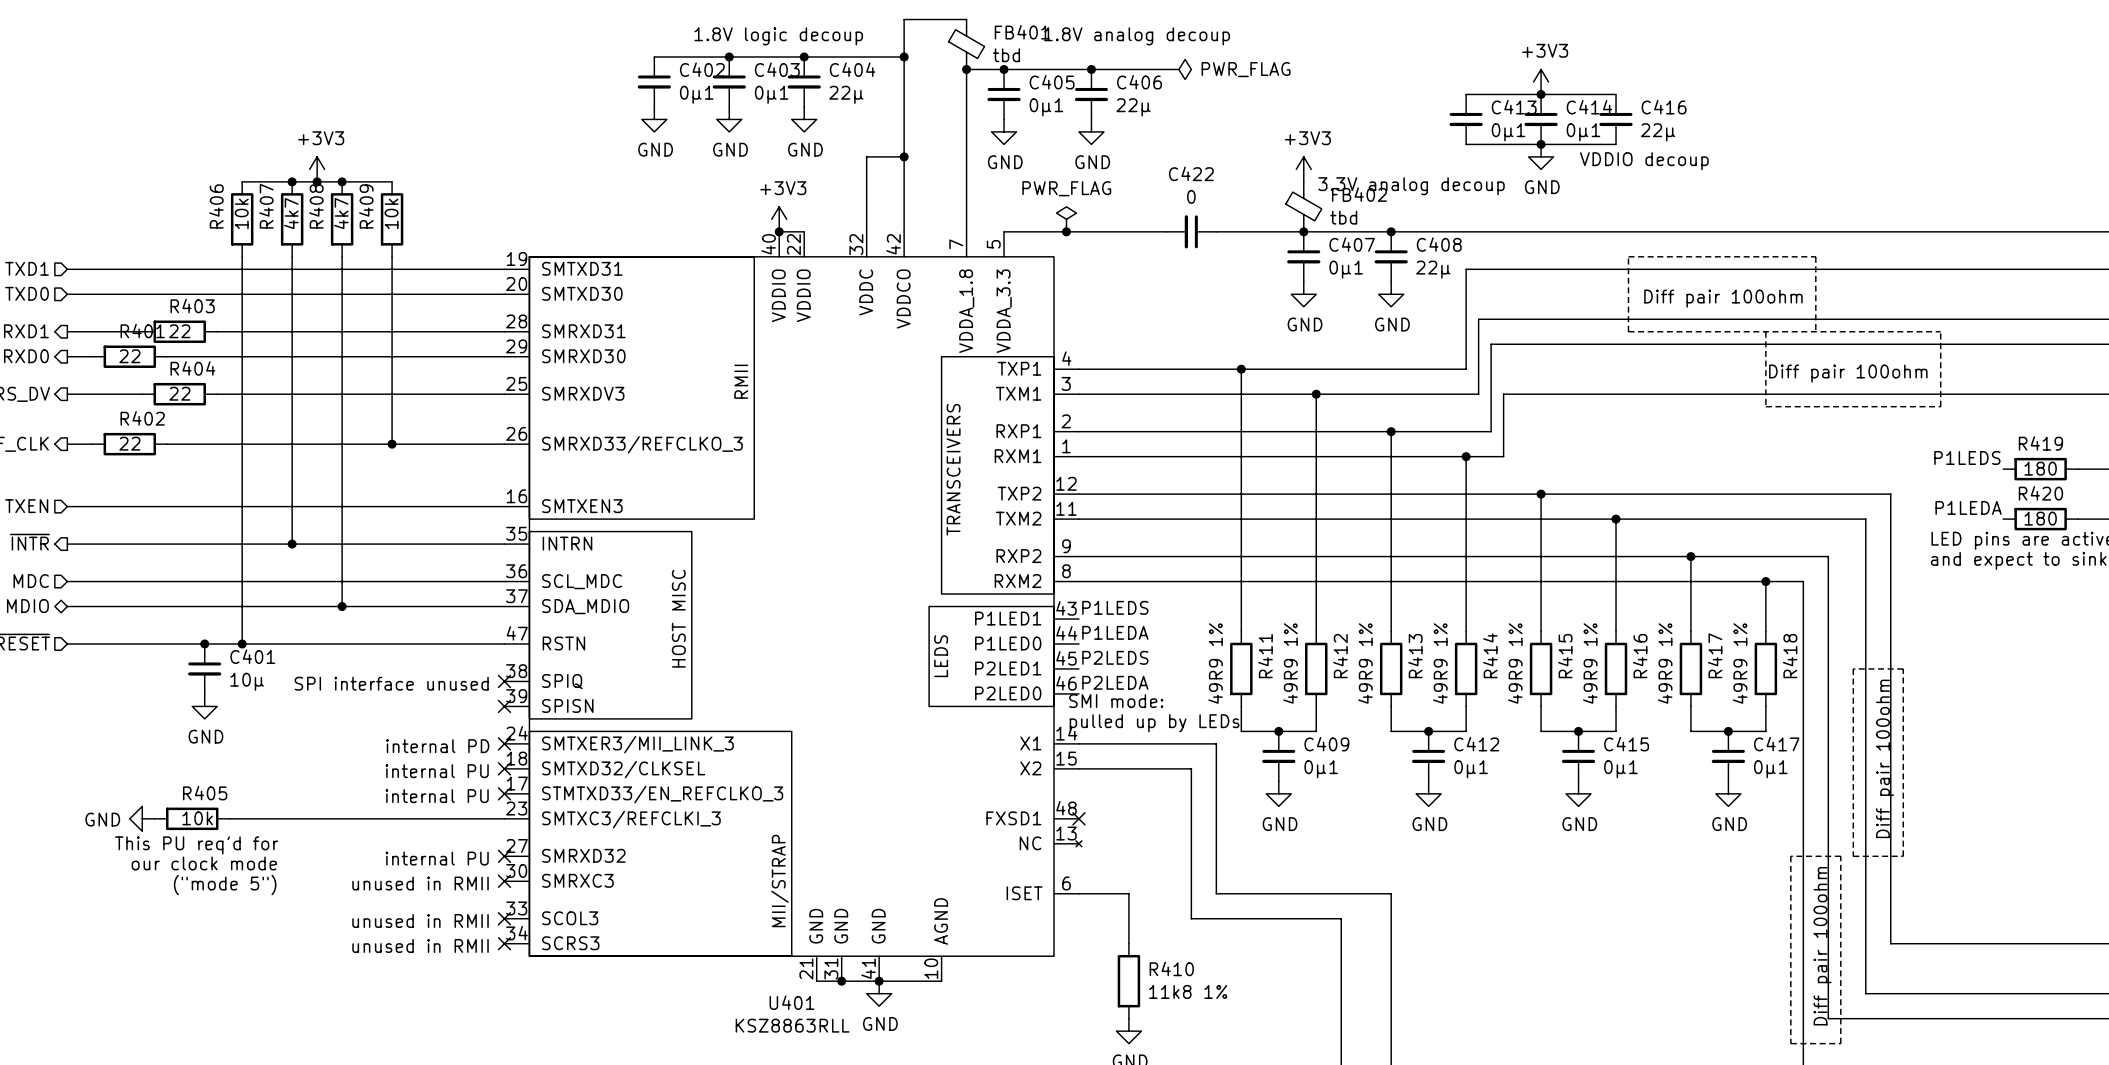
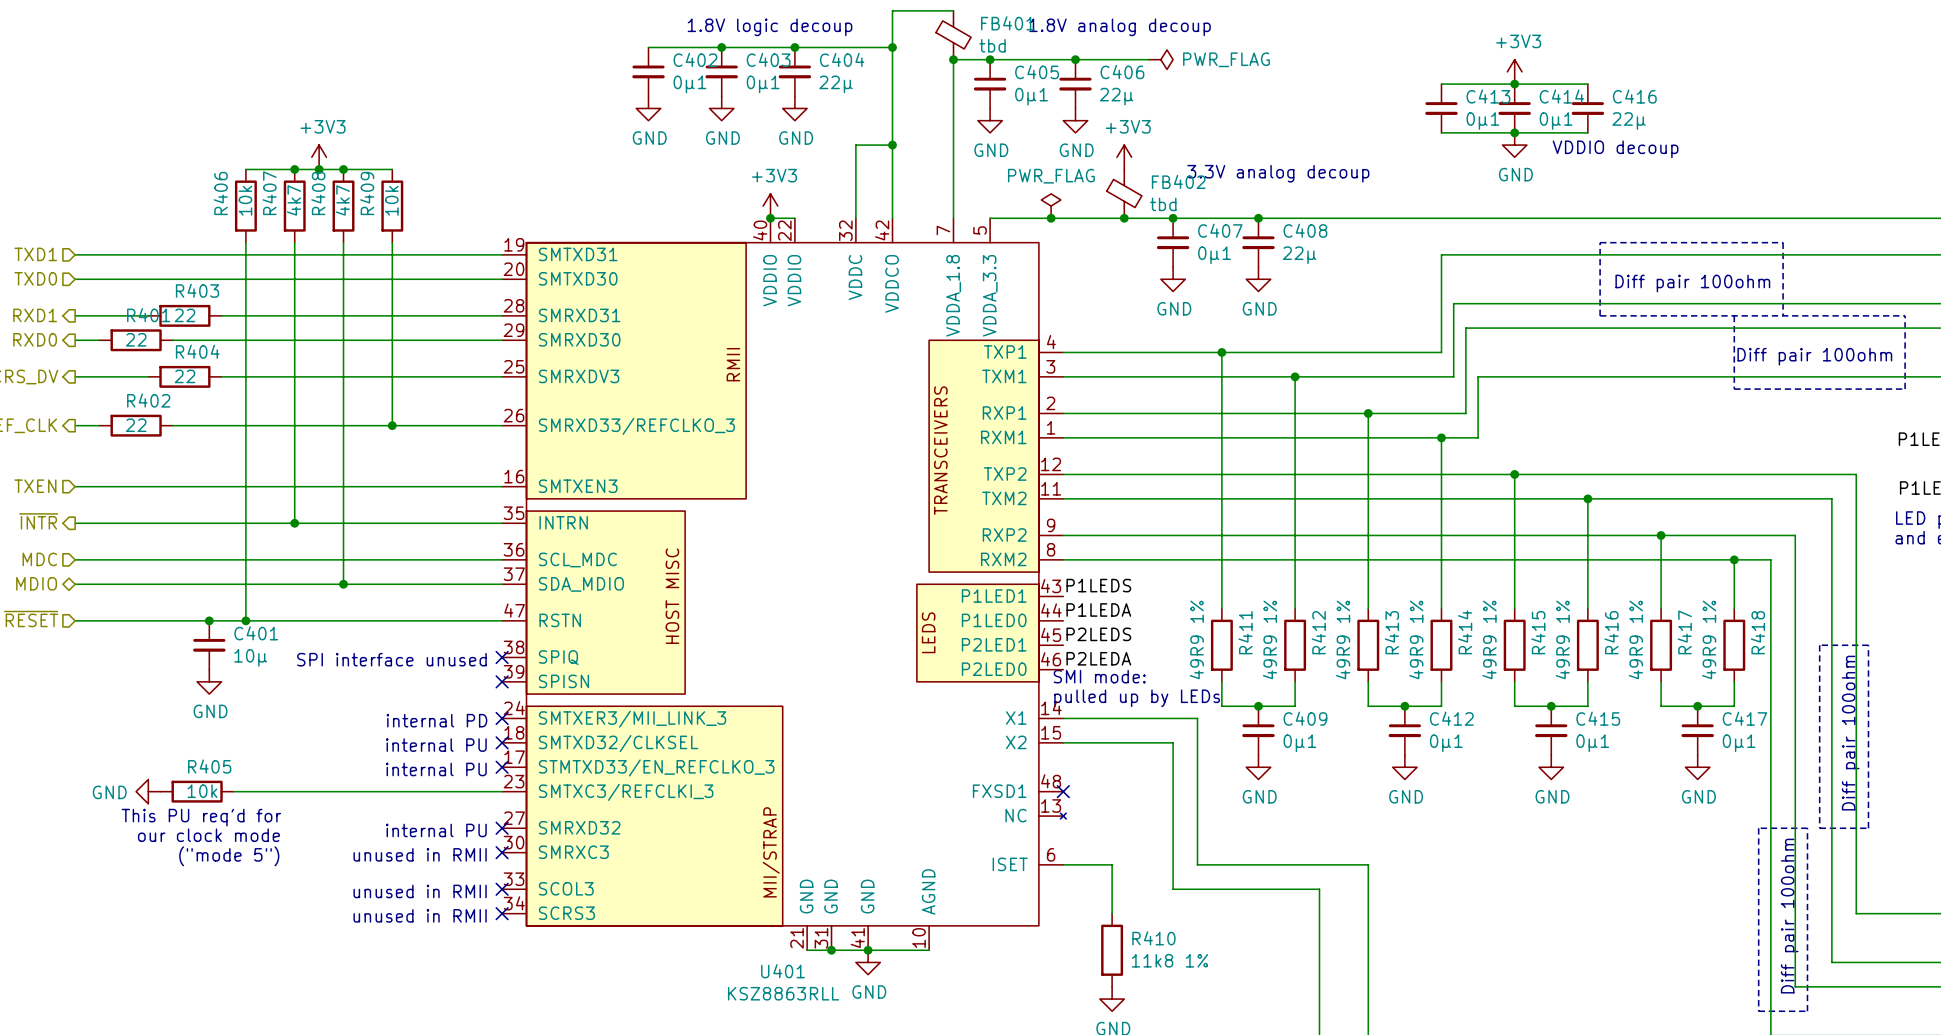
power symbol position: +3V3 (1303, 169) -> +3V3 (1124, 157)
text position: 3.3V analog decoup (1411, 186) -> 3.3V analog decoup (1278, 173)
FB402 position: (1303, 206) -> (1124, 193)
junction: none -> (1124, 218)
junction: none -> (1173, 218)
C422: 0 (1191, 231) -> none
junction position: (1303, 231) -> (1258, 218)
junction: (1391, 231) -> none
C407 position: (1303, 256) -> (1173, 242)
C408 position: (1391, 256) -> (1258, 242)
power symbol: none -> GND (1173, 279)
power symbol position: GND (1303, 294) -> GND (1258, 279)
power symbol: GND (1391, 294) -> none

